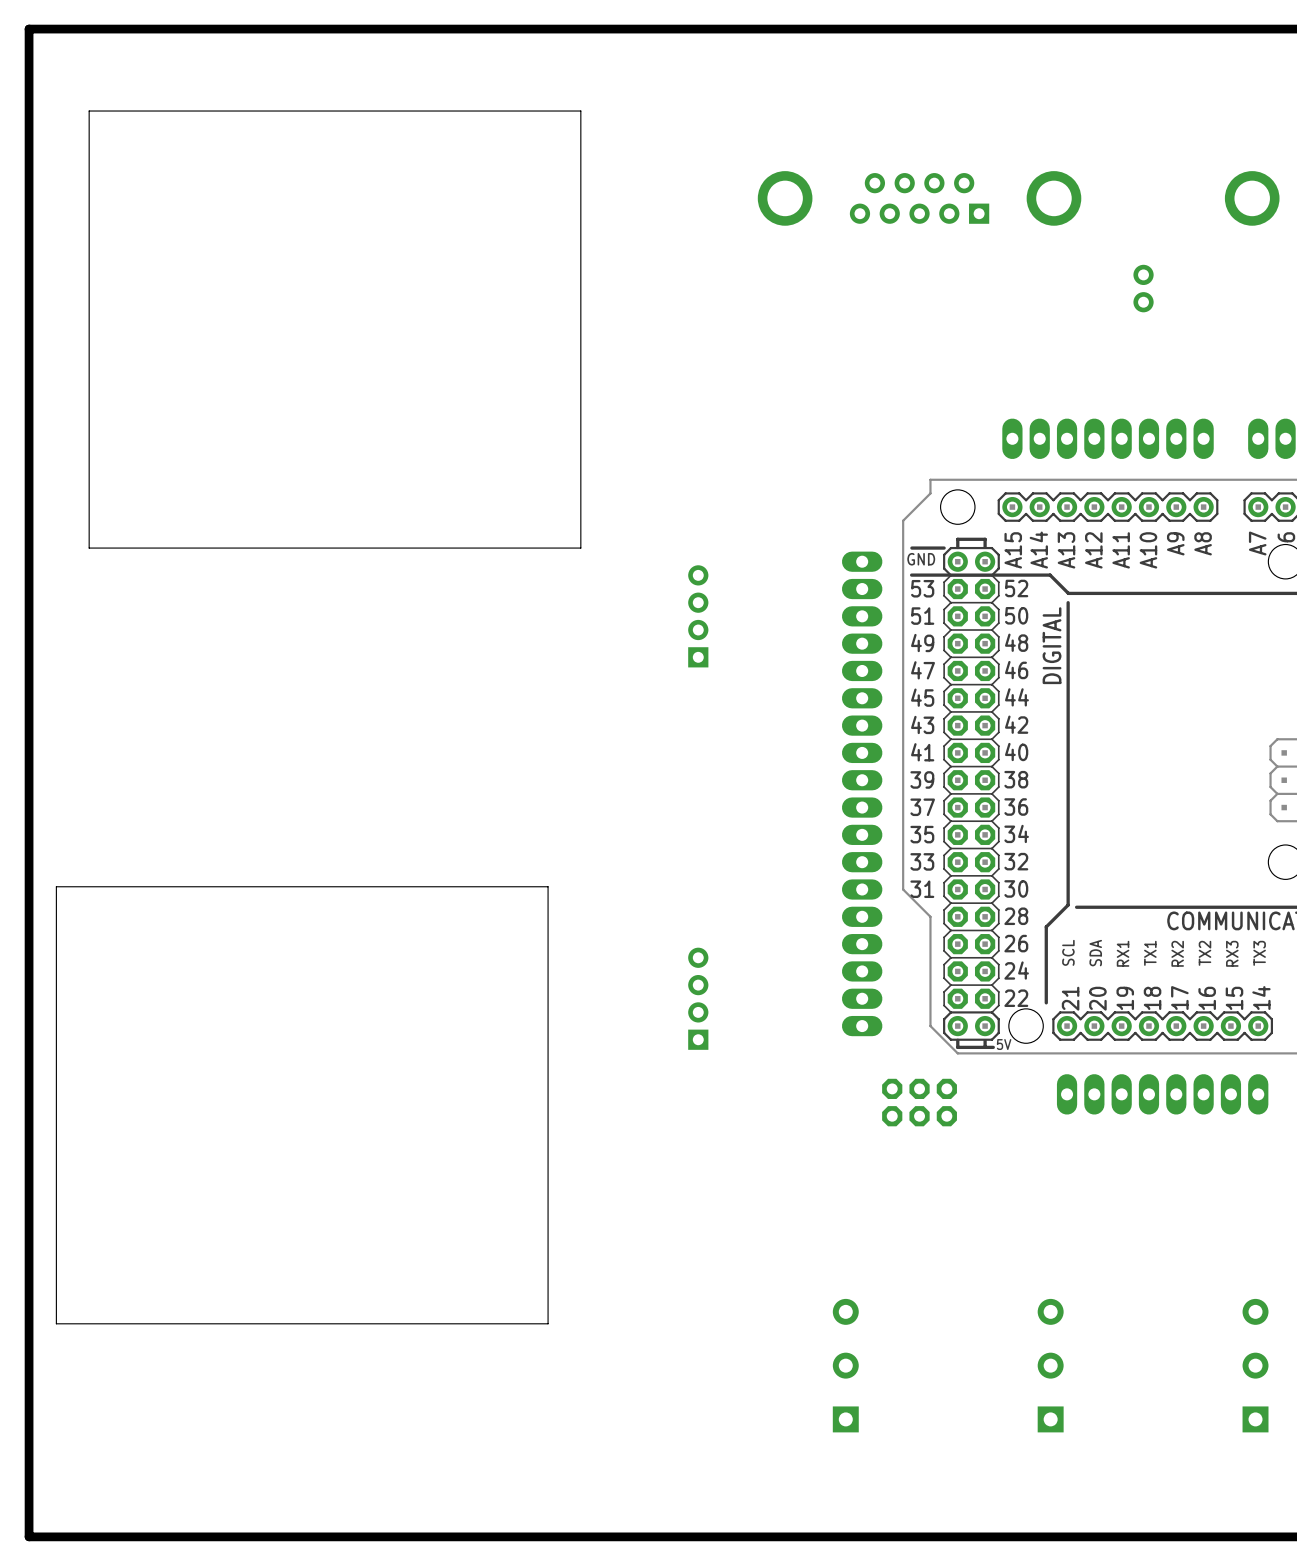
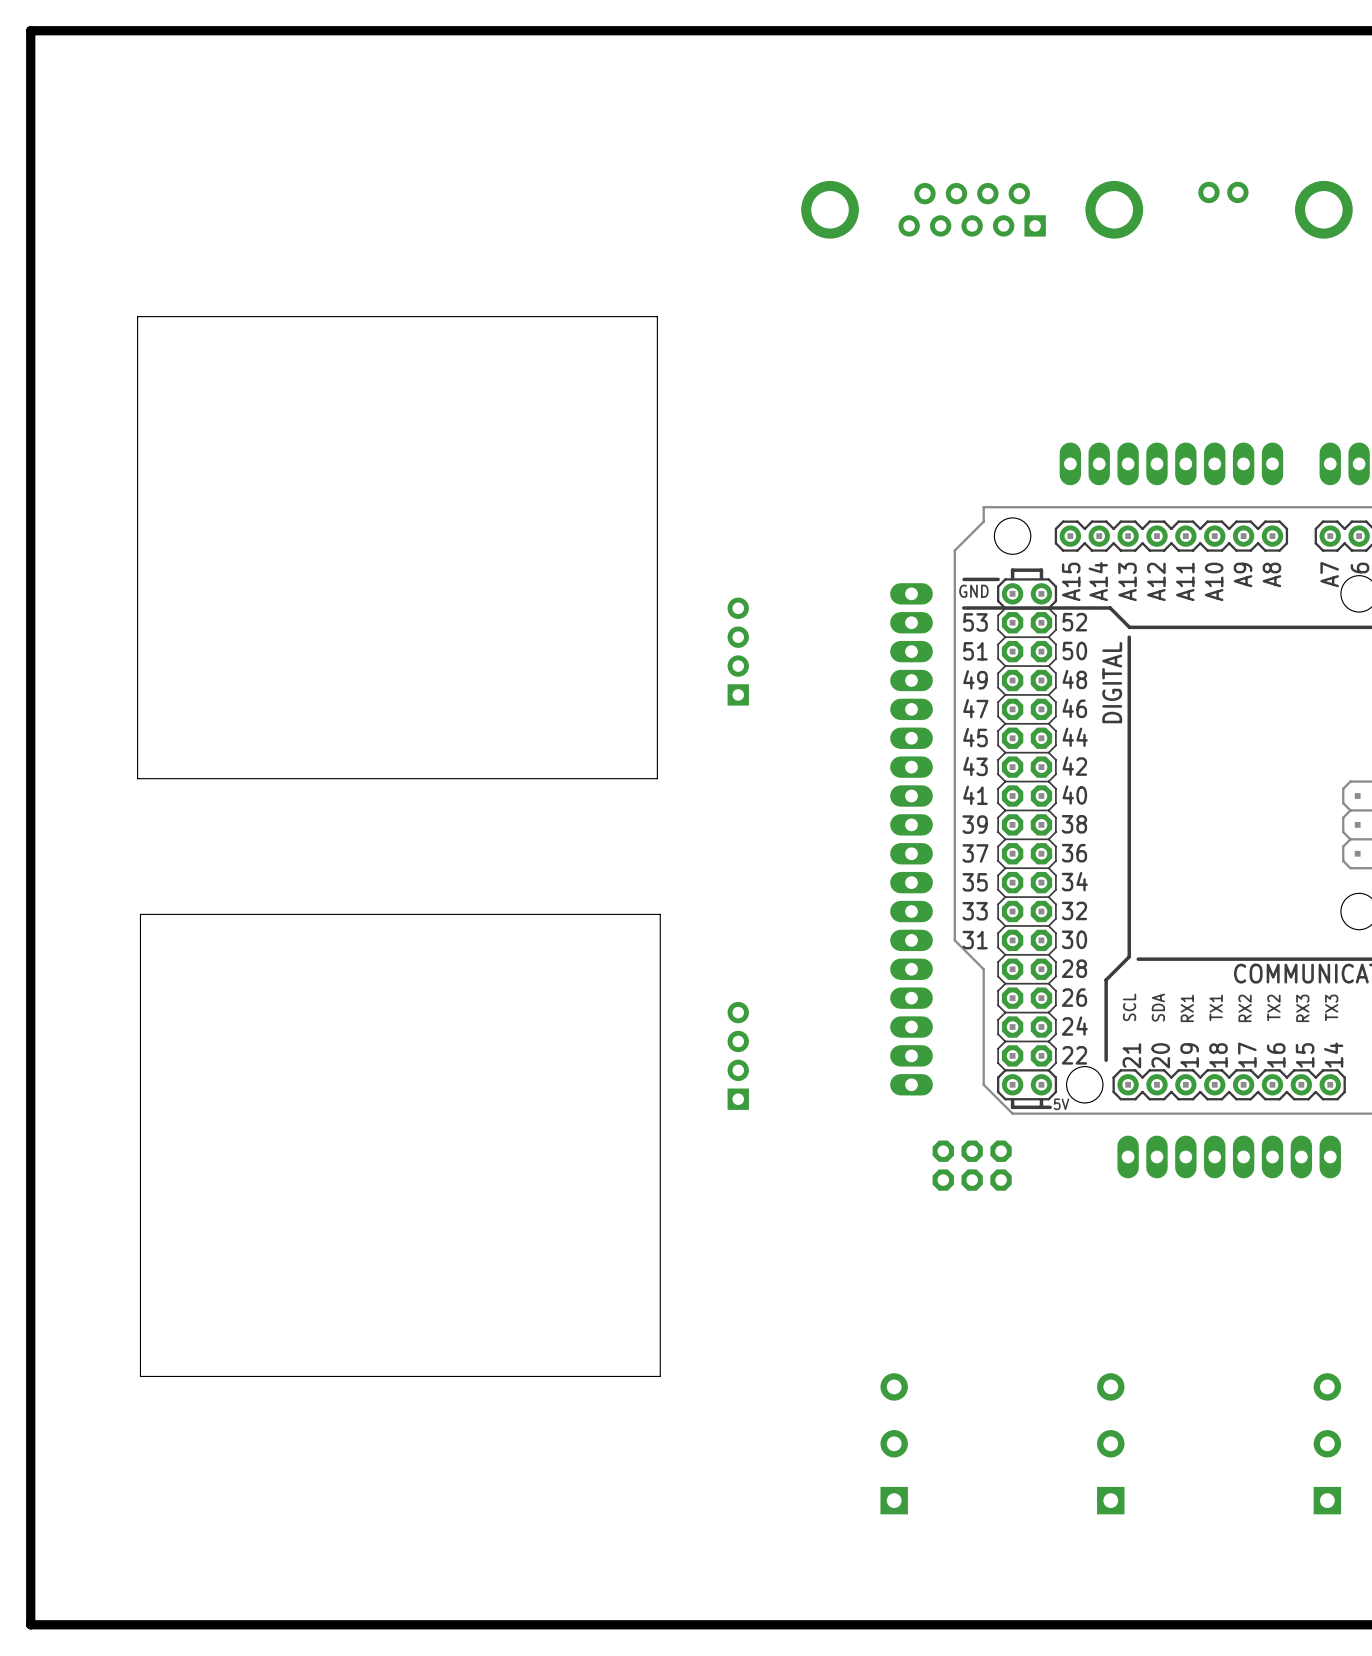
board edge: (580, 111) (89, 111) (89, 548) (580, 548) (580, 111) -> (657, 316) (137, 316) (137, 778) (657, 778) (657, 316)
part rotation: 0° (1143, 288) -> 90° clockwise (1223, 192)
part position: (1143, 288) -> (1223, 192)
board edge: (548, 886) (56, 886) (56, 1323) (548, 1323) (548, 886) -> (660, 914) (140, 914) (140, 1376) (660, 1376) (660, 914)

